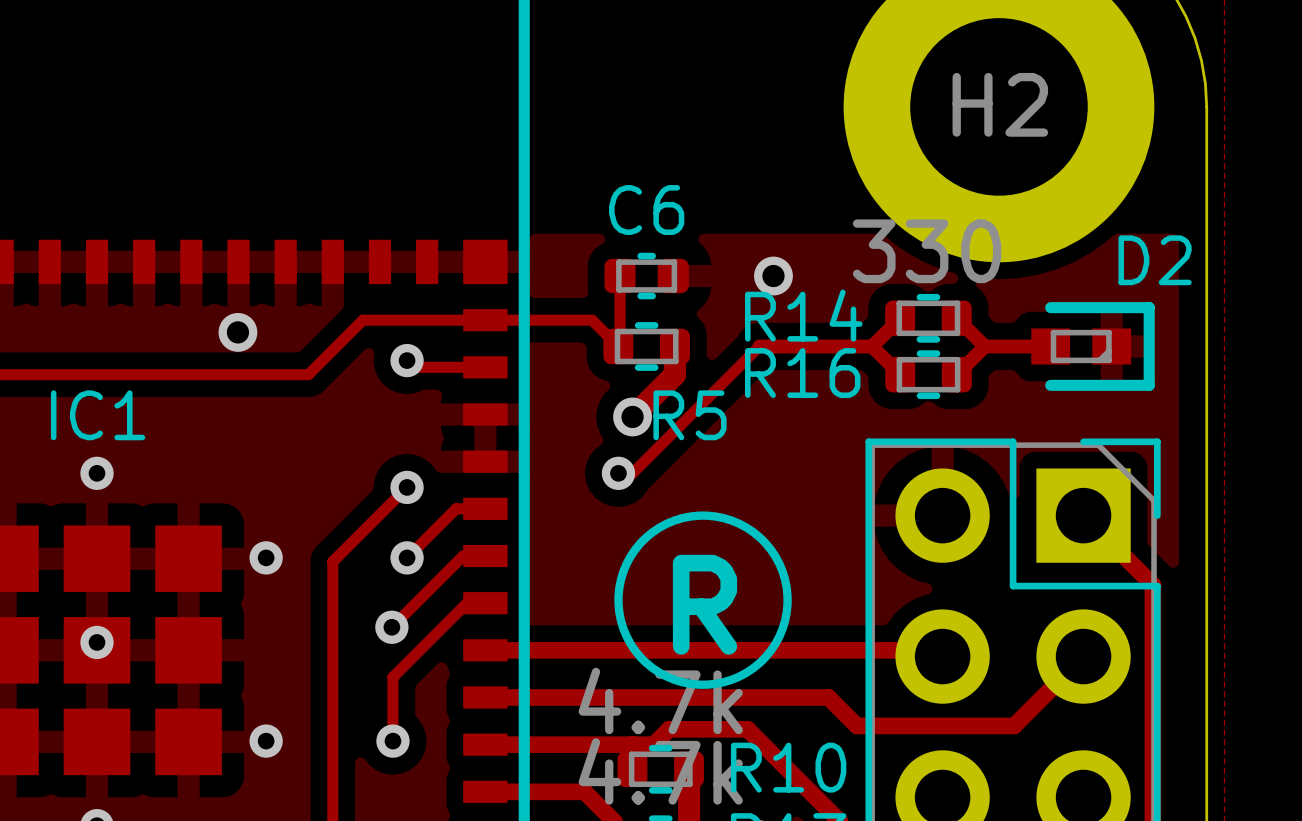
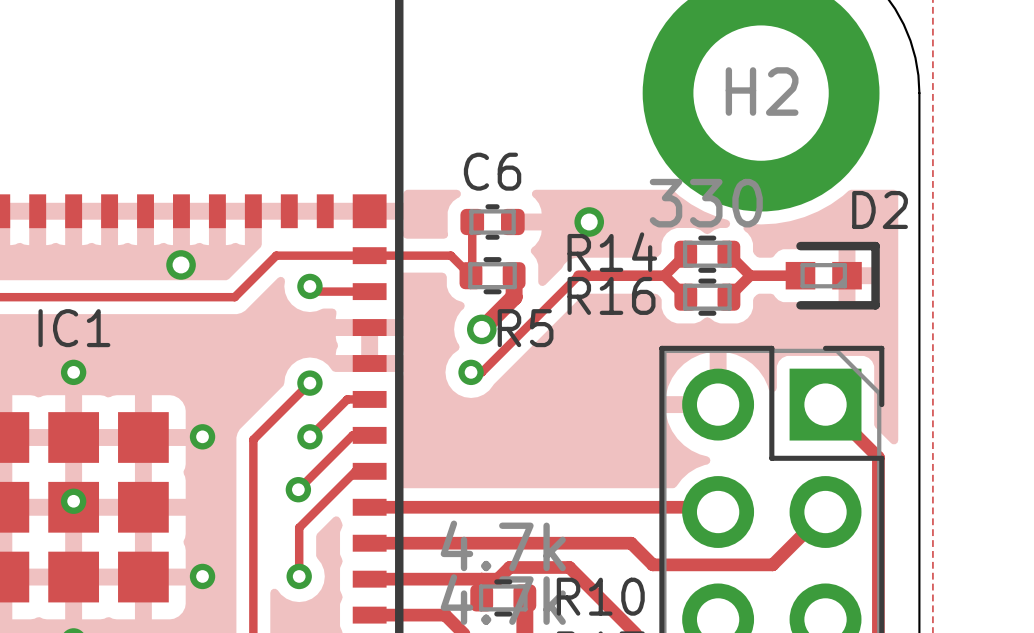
drawing: [614, 511, 792, 689] -> none
text: R (705, 604) -> none

